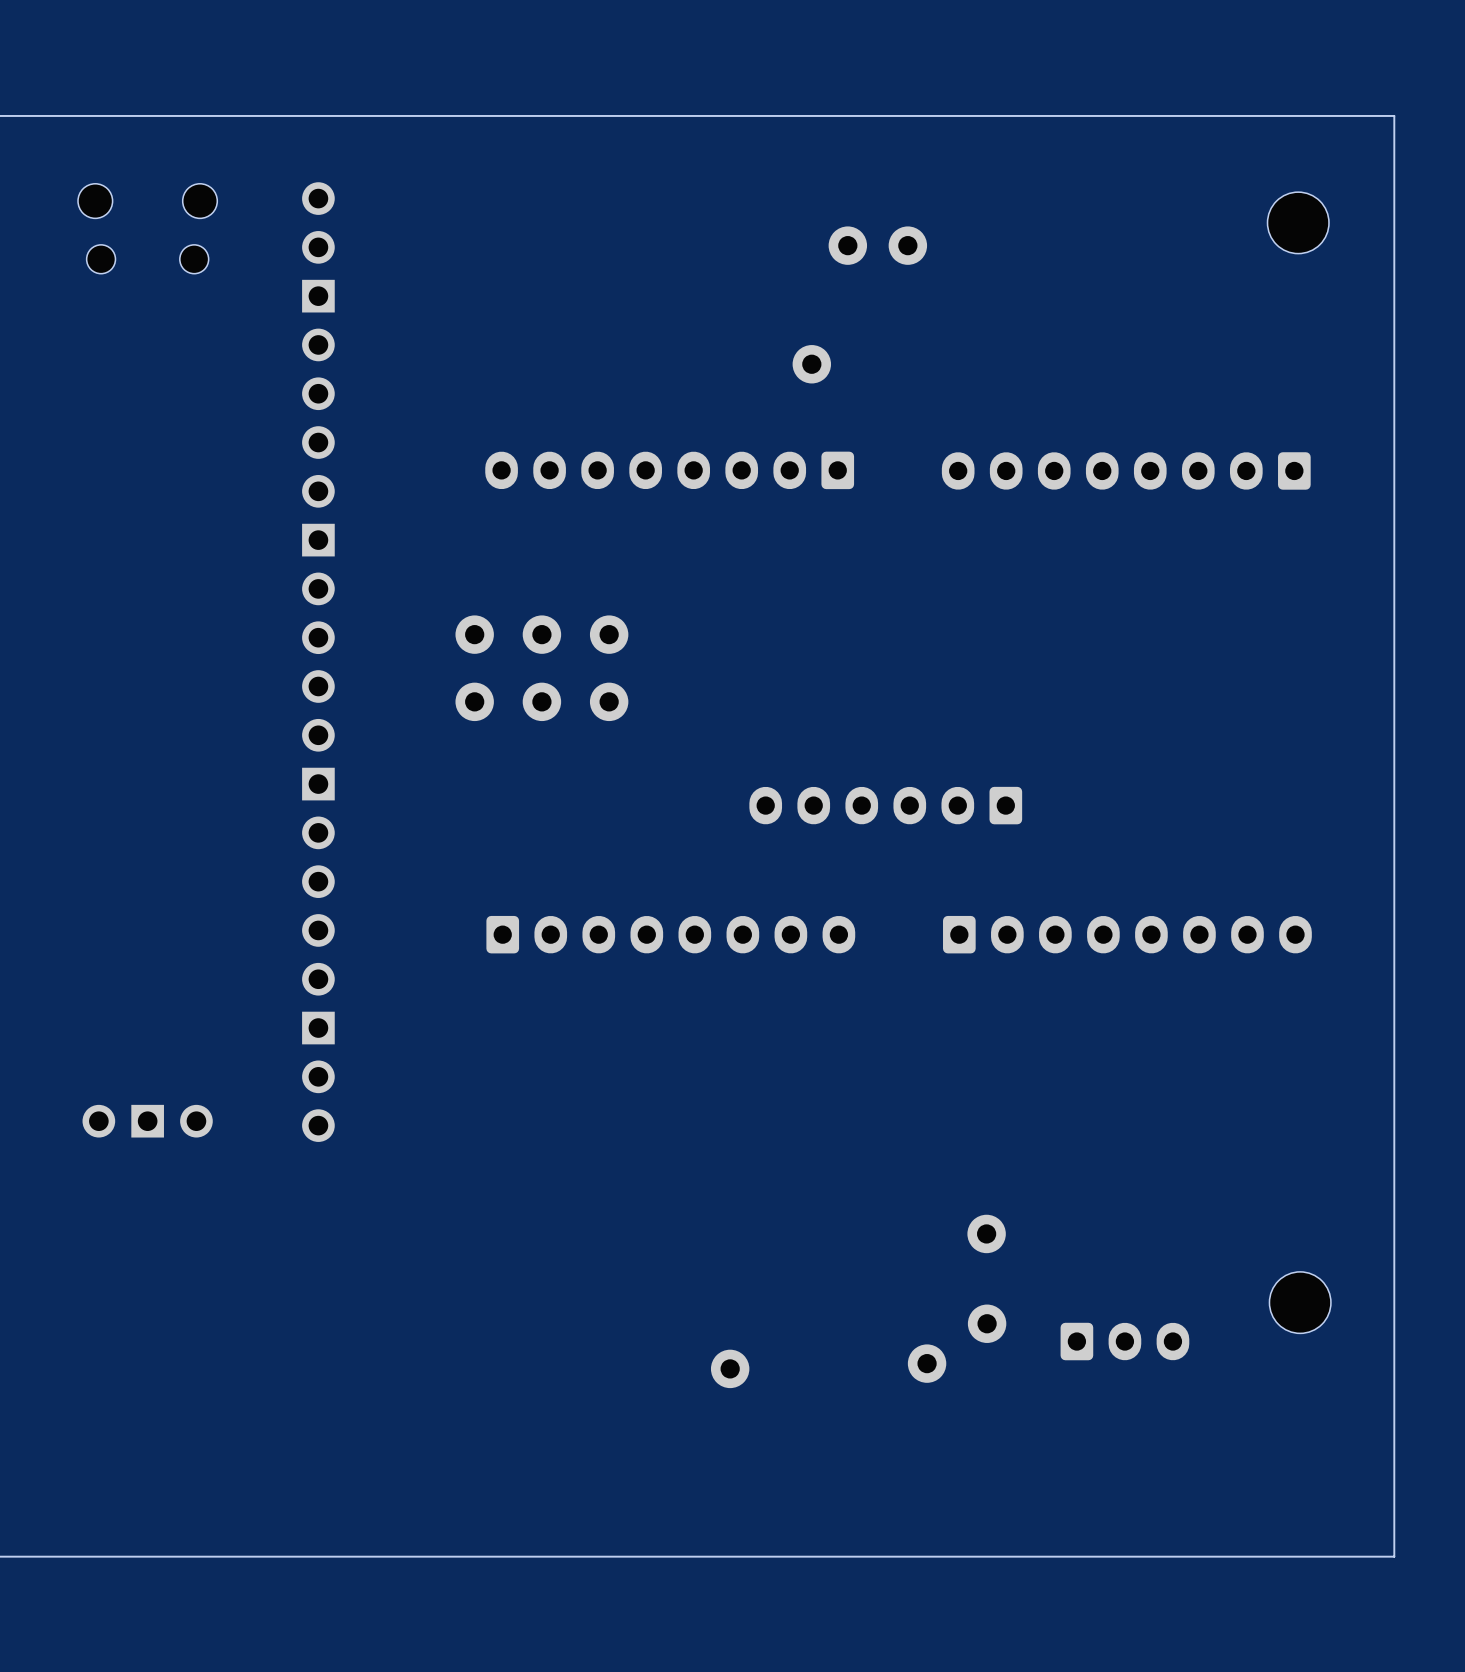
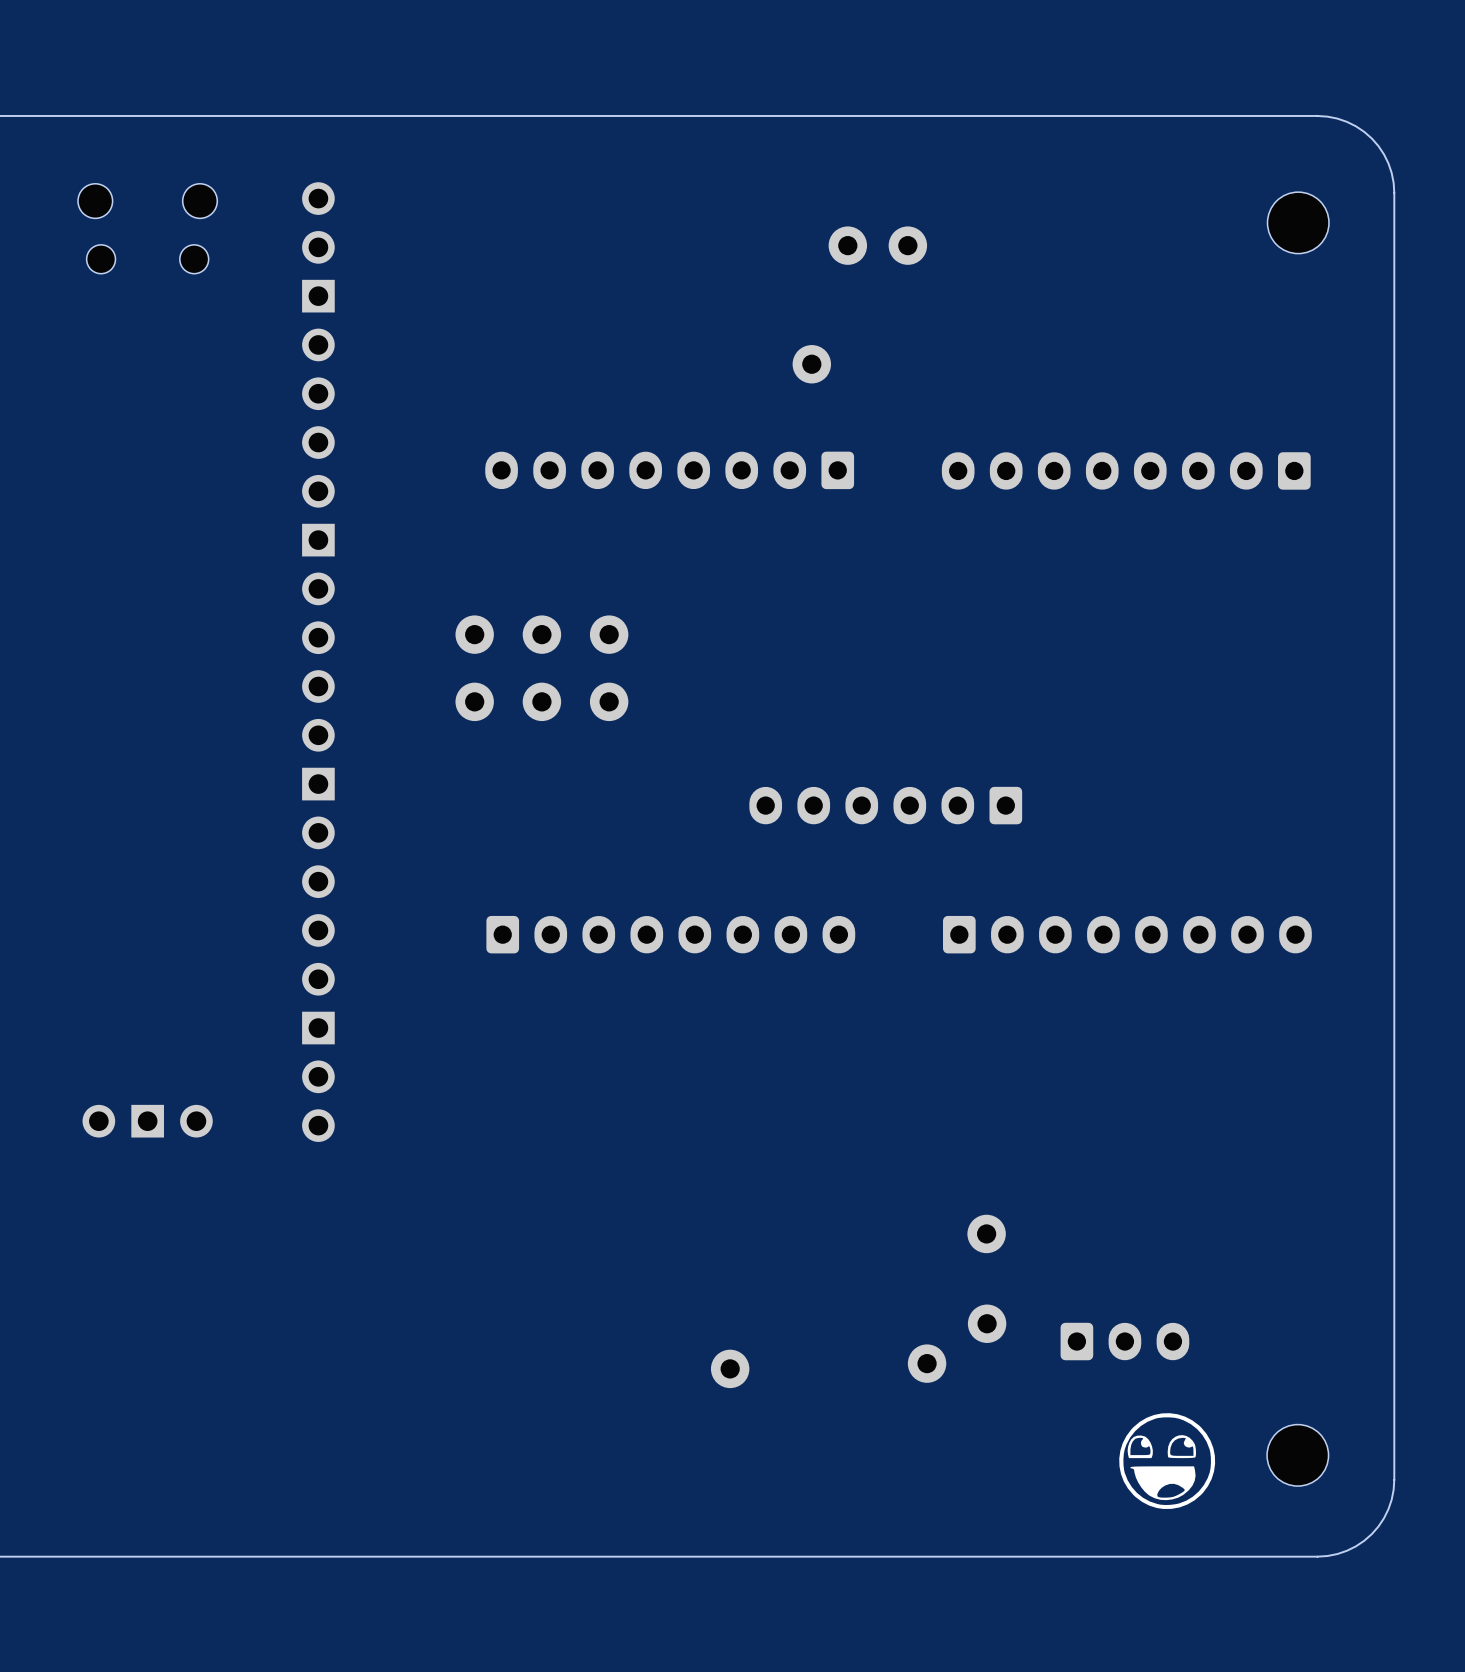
board edge: (1317, 115) (1394, 115) (1394, 192) -> (1317, 115) (1346, 121) (1371, 138) (1388, 163) (1394, 192)
part position: (1300, 1302) -> (1297, 1455)
drawing: none -> [1119, 1413, 1216, 1509]
board edge: (1394, 1479) (1394, 1556) (1317, 1556) -> (1394, 1479) (1388, 1509) (1371, 1534) (1346, 1550) (1317, 1556)

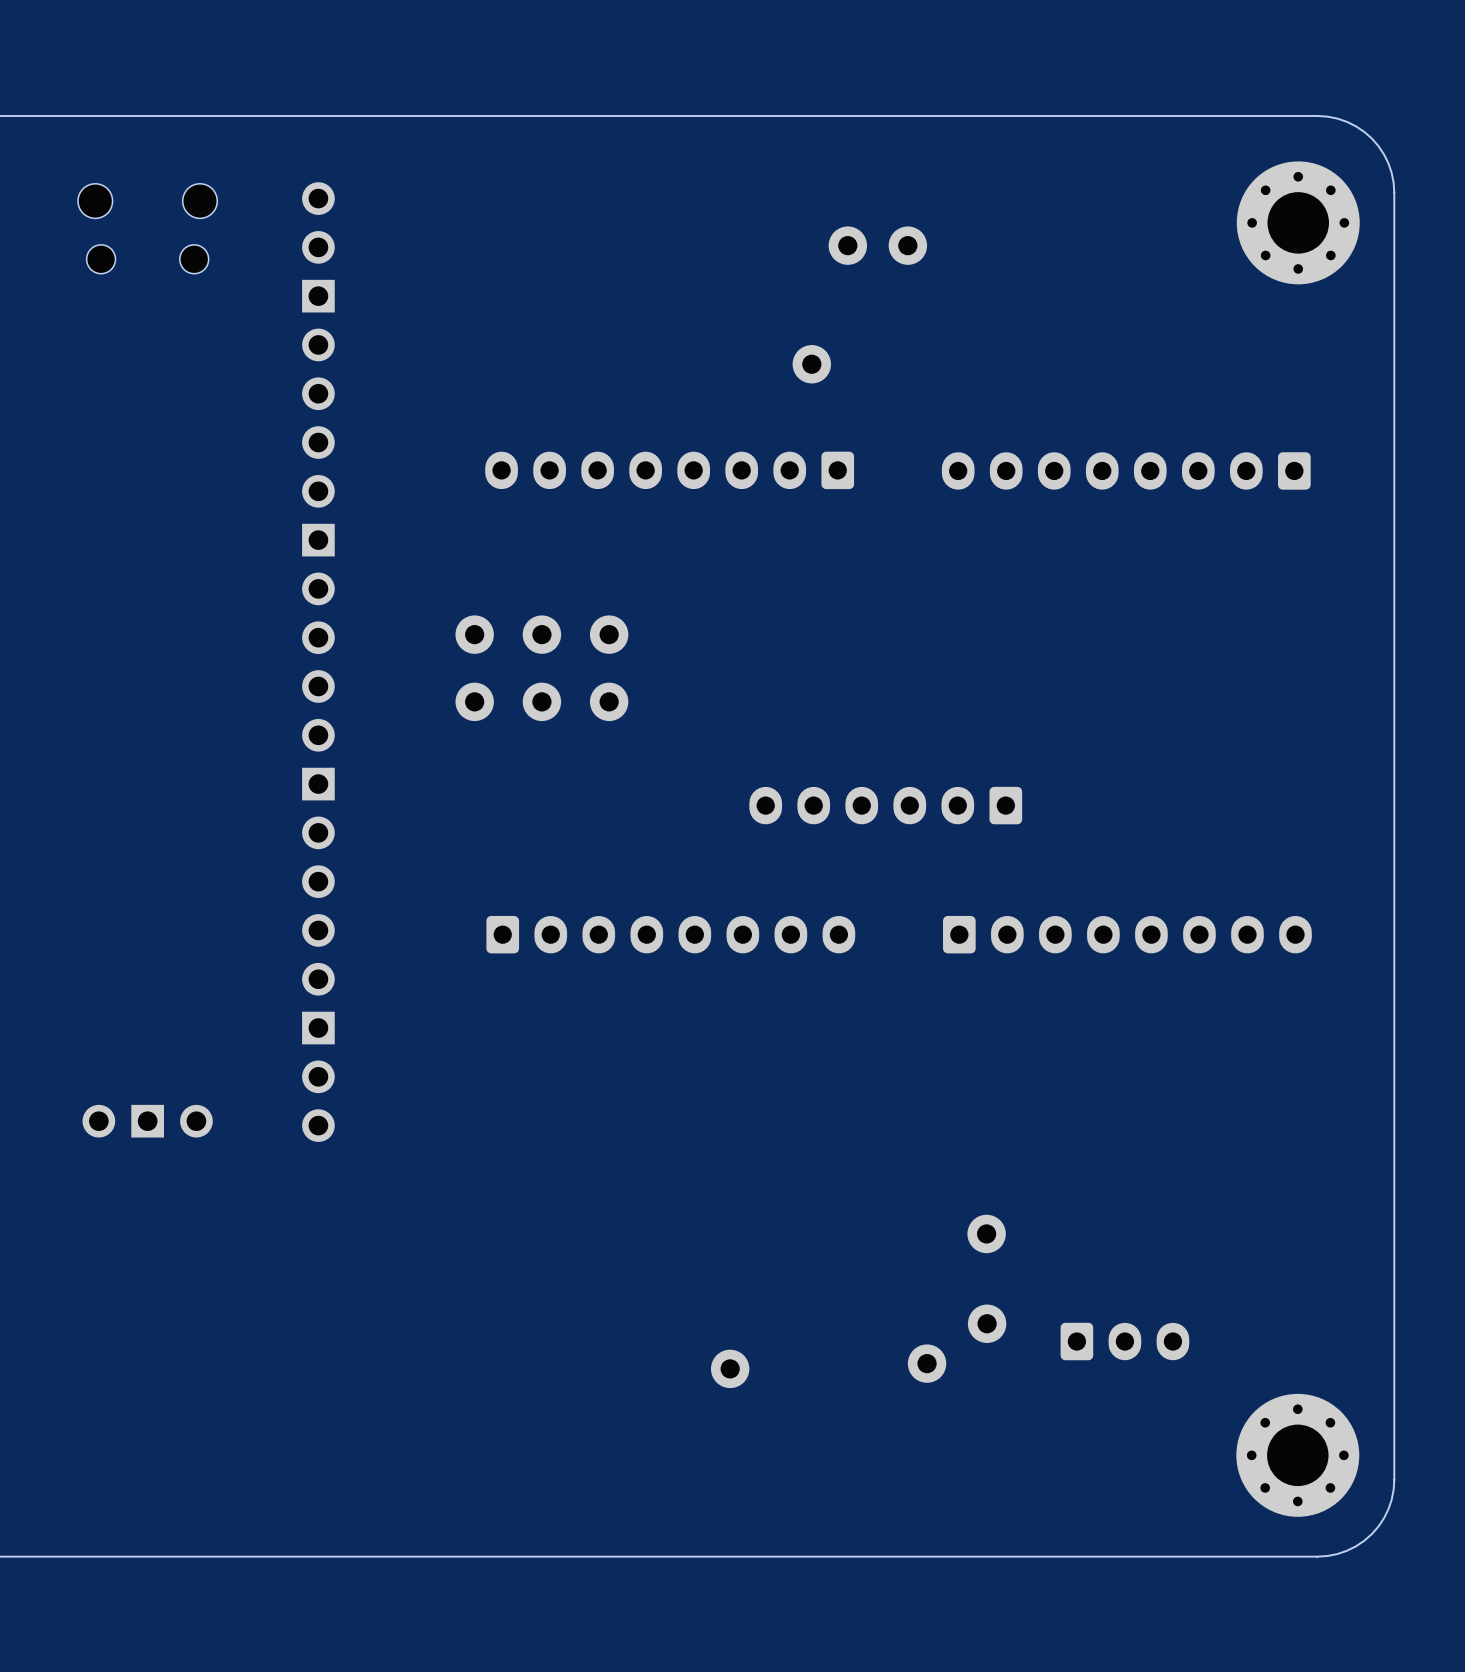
part footprint: [1267, 192, 1329, 254] -> [1236, 161, 1360, 285]
drawing: [1119, 1413, 1216, 1509] -> none
part footprint: [1267, 1424, 1329, 1487] -> [1236, 1393, 1360, 1517]

